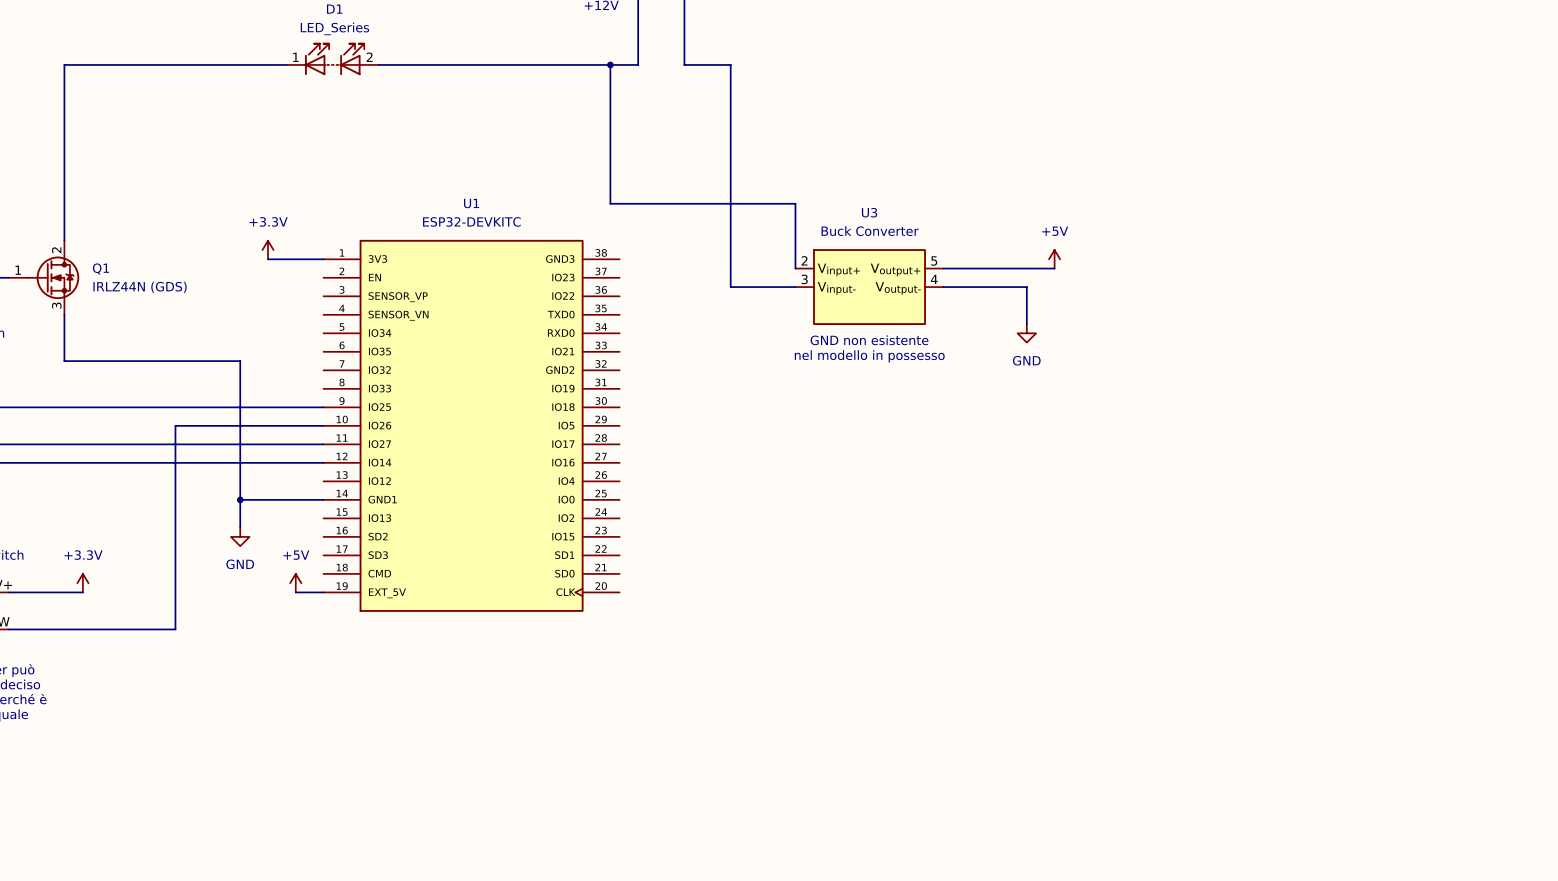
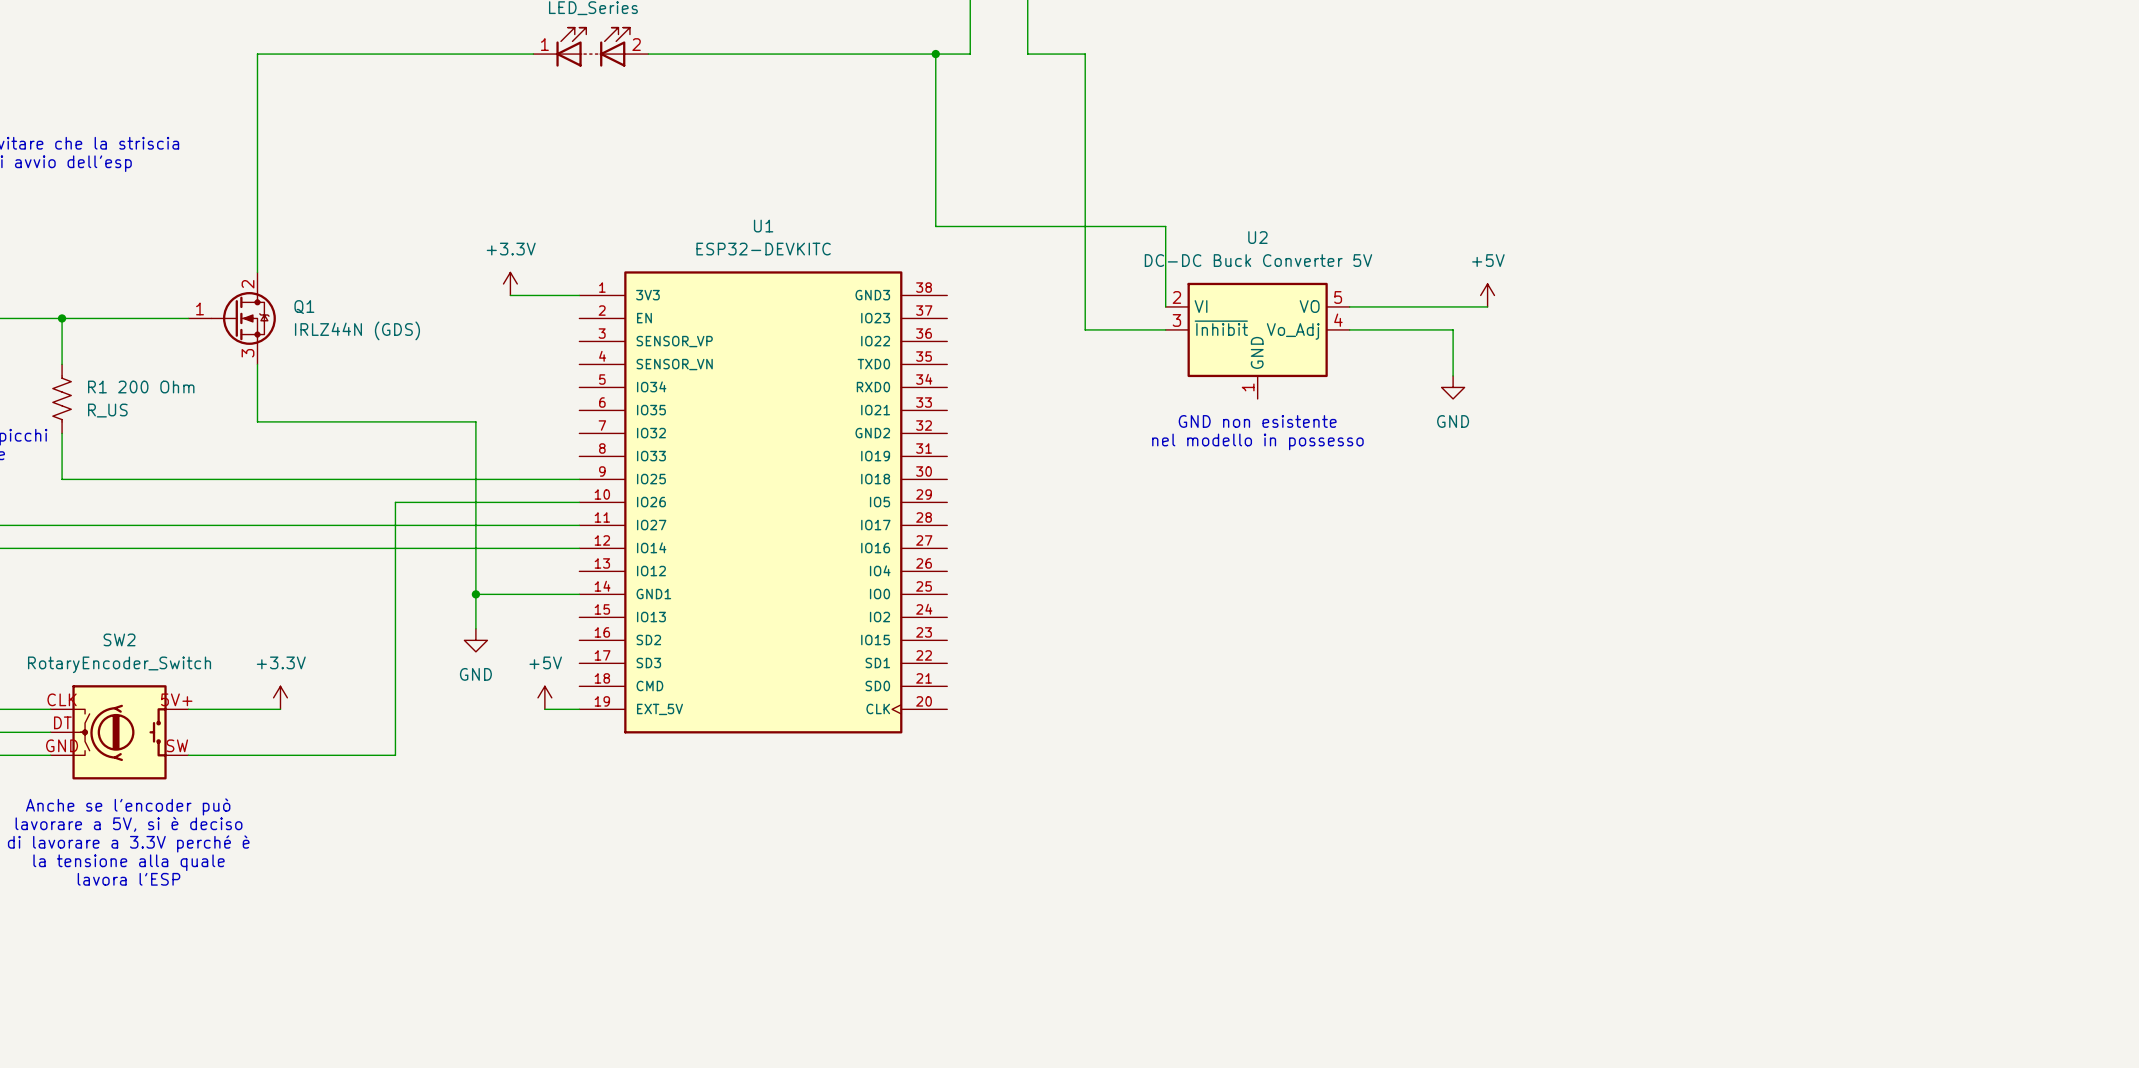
U3: Buck Converter (869, 287) -> none
U2: none -> DC-DC Buck Converter 5V (1257, 340)
text: GND non esistente (869, 340) -> none
text: nel modello in possesso (869, 356) -> GND non esistente (1257, 421)
text: none -> nel modello in possesso (1257, 441)

